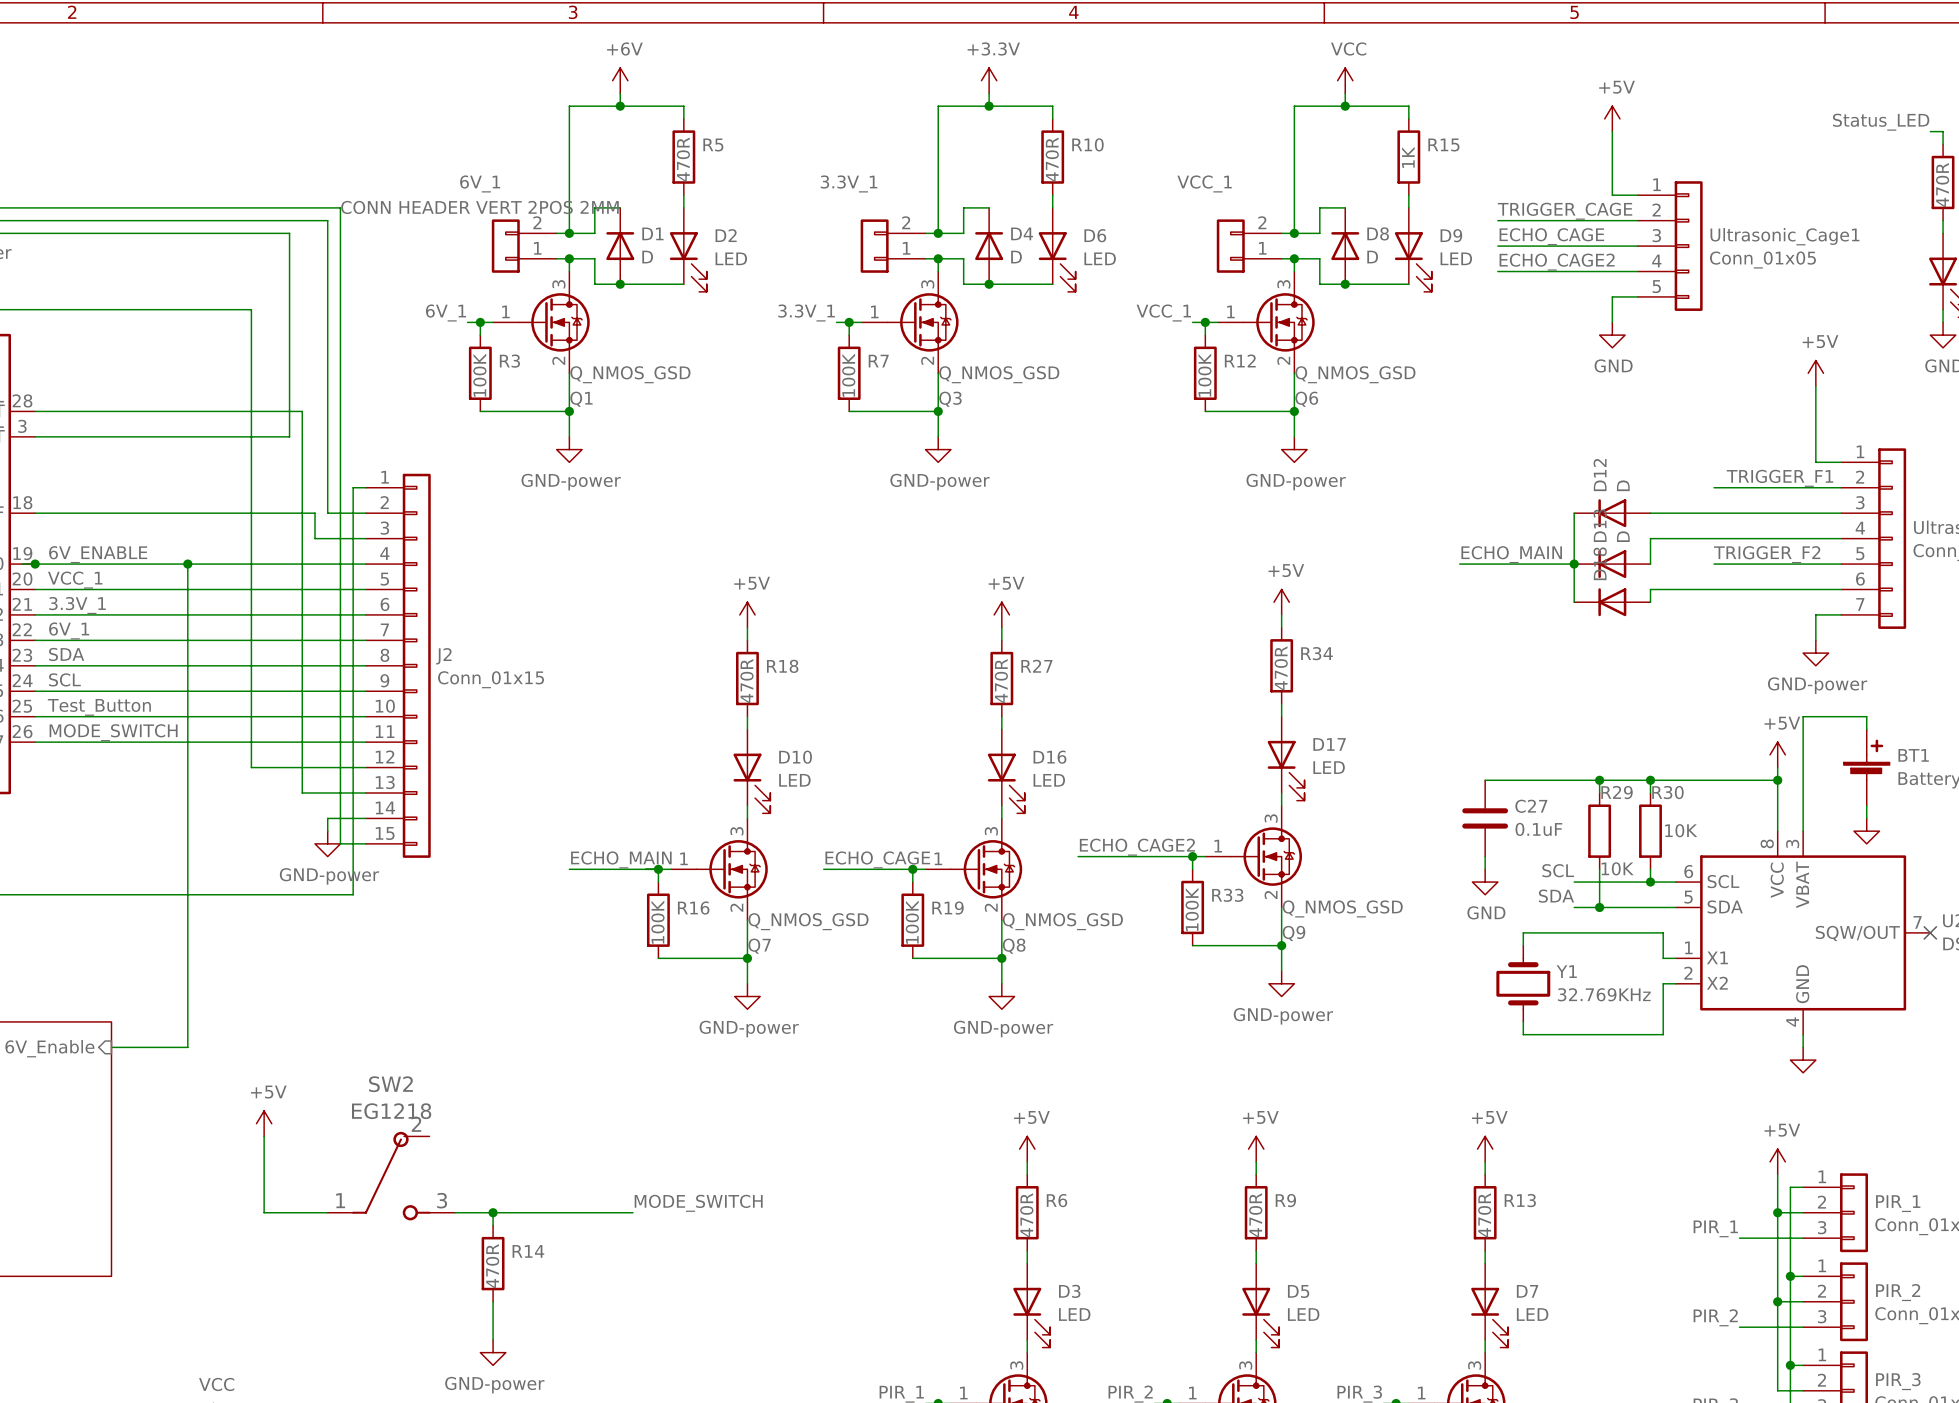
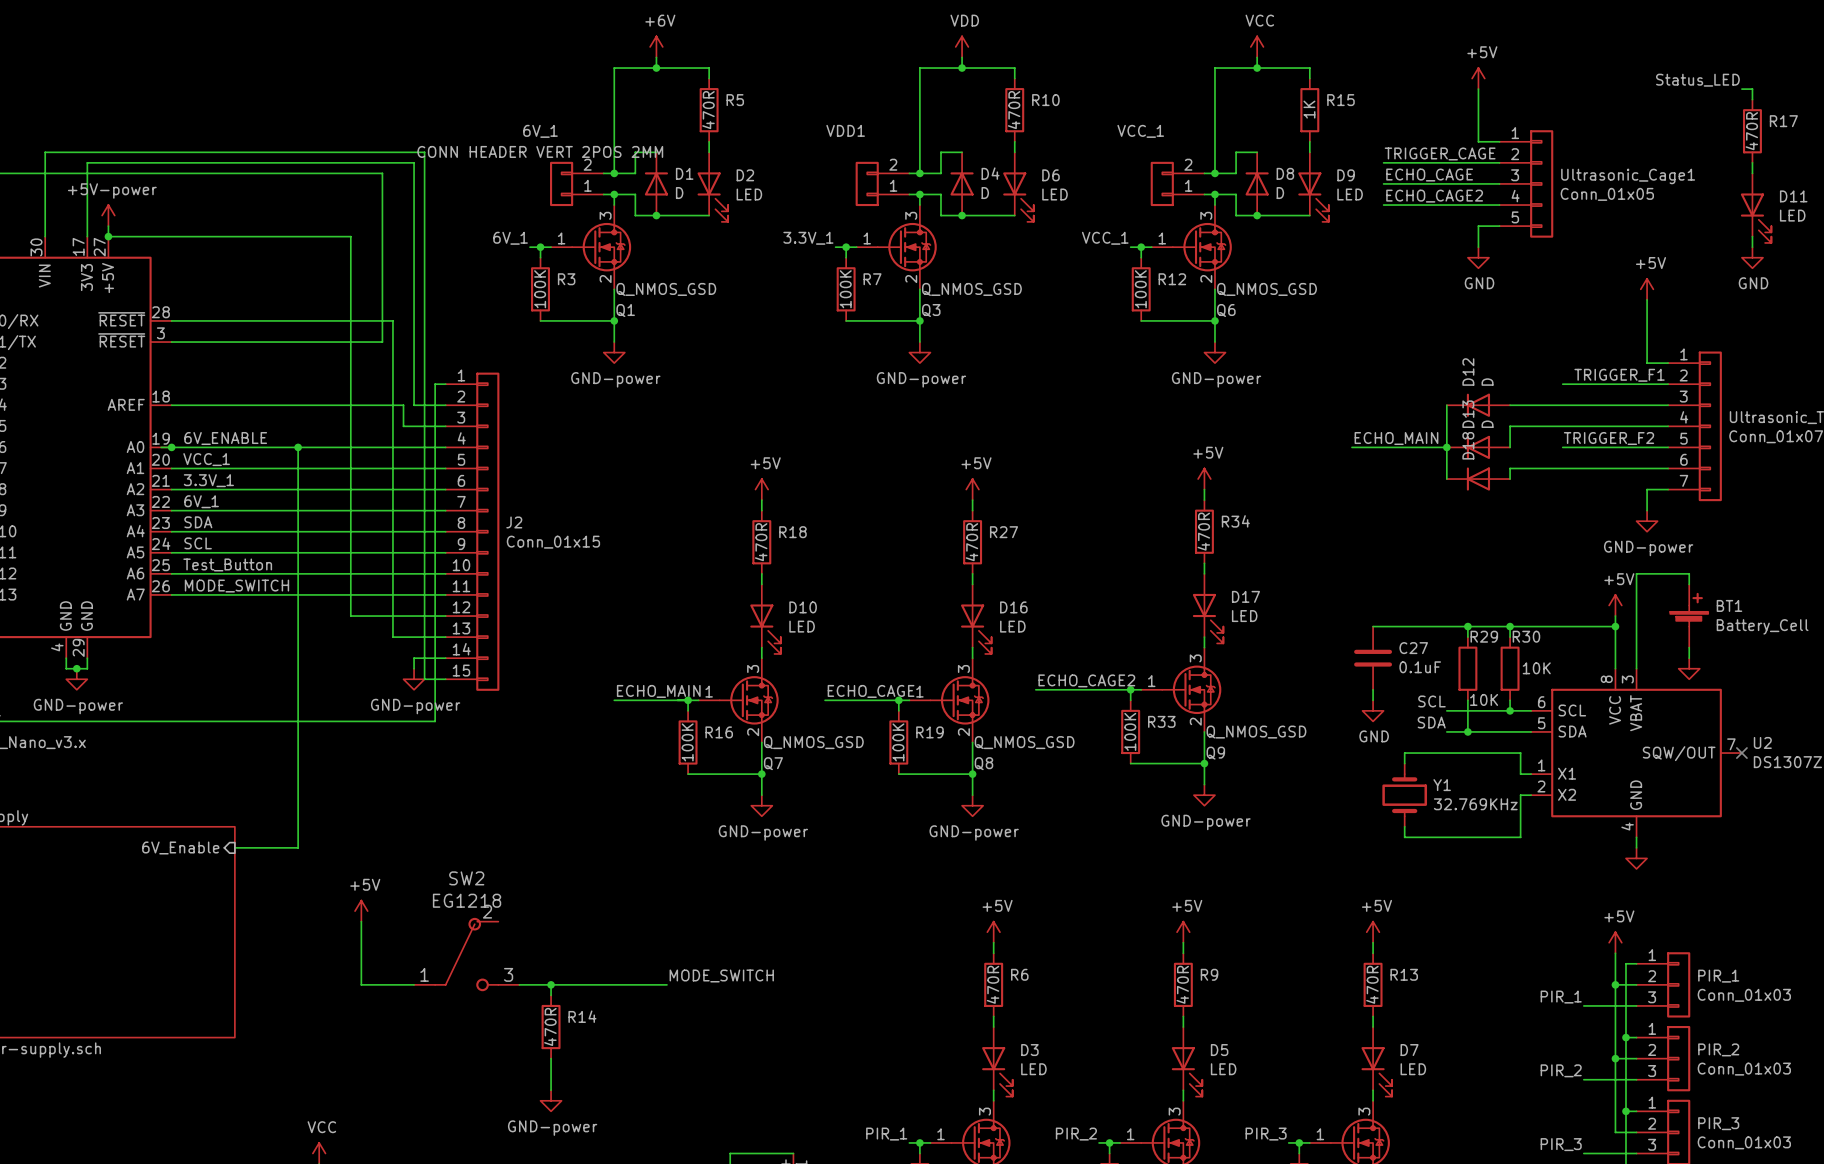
power symbol: +3.3V (989, 80) -> VDD (962, 46)
3.3V_1 name: 3.3V_1 (849, 183) -> VDD1 (845, 130)

